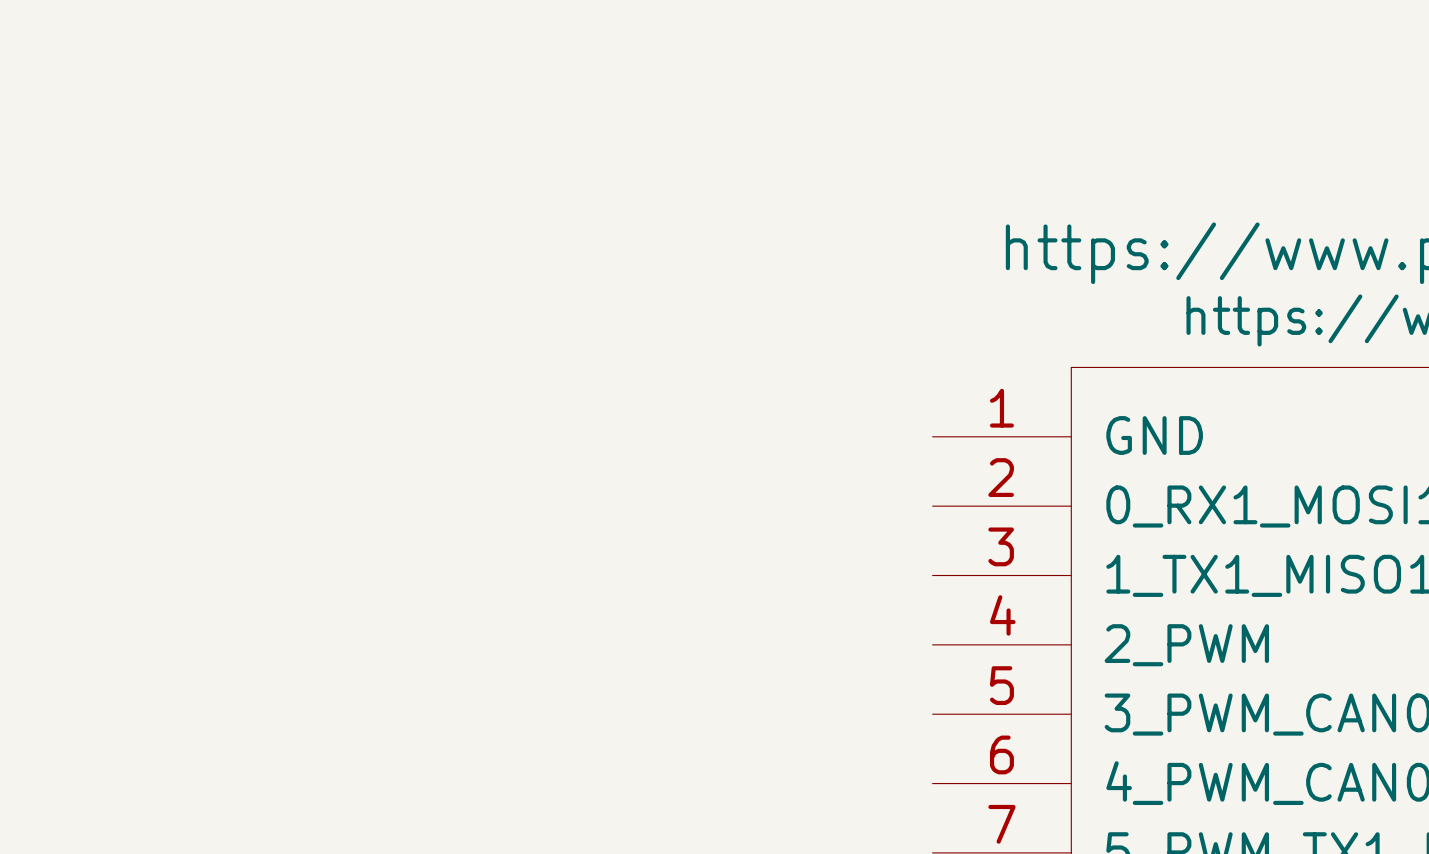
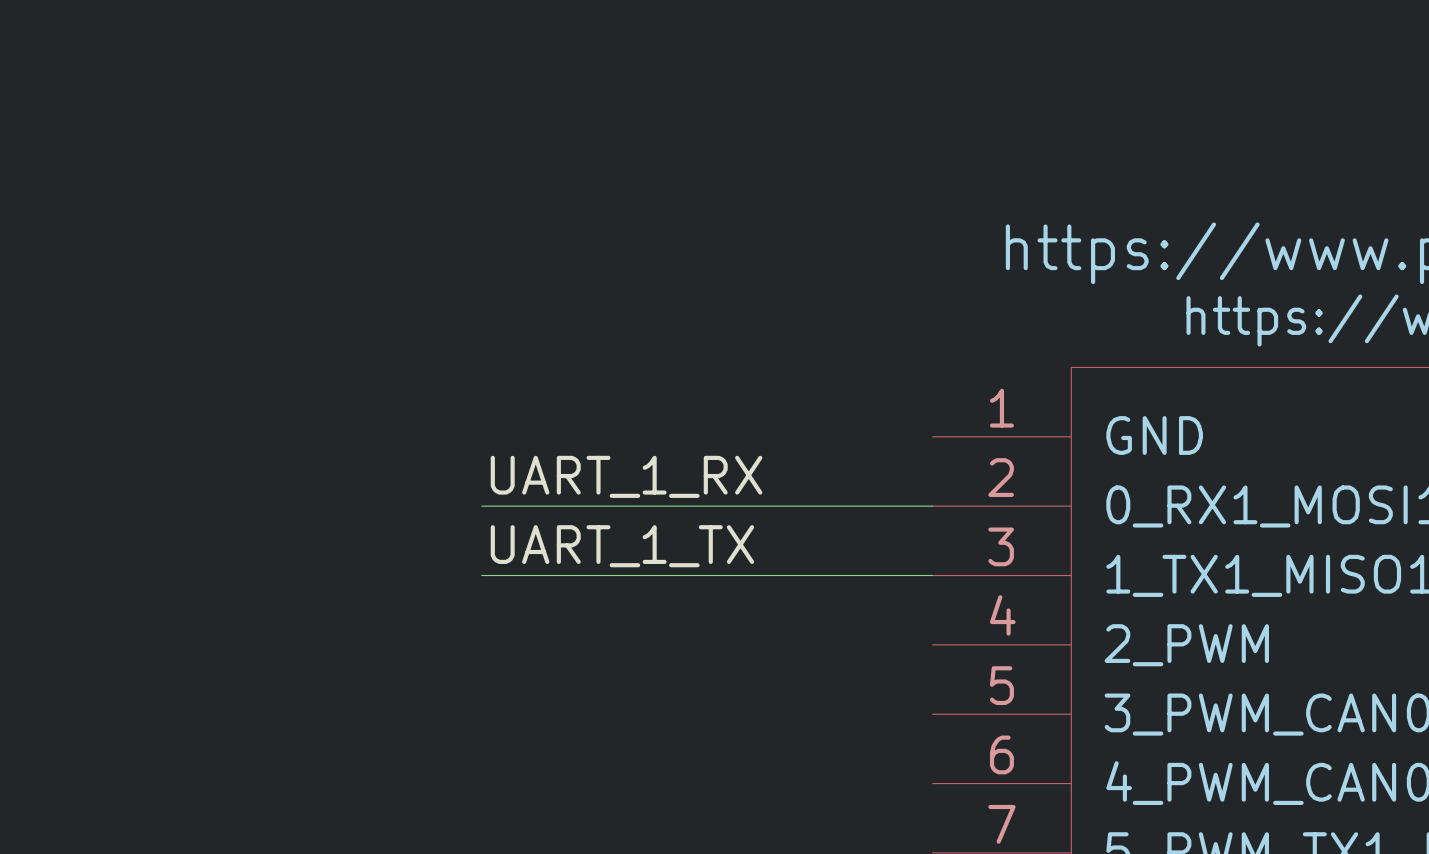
label: none -> UART_1_RX (626, 476)
wire: none -> (481, 506) (932, 506)
label: none -> UART_1_TX (622, 546)
wire: none -> (481, 575) (932, 575)

